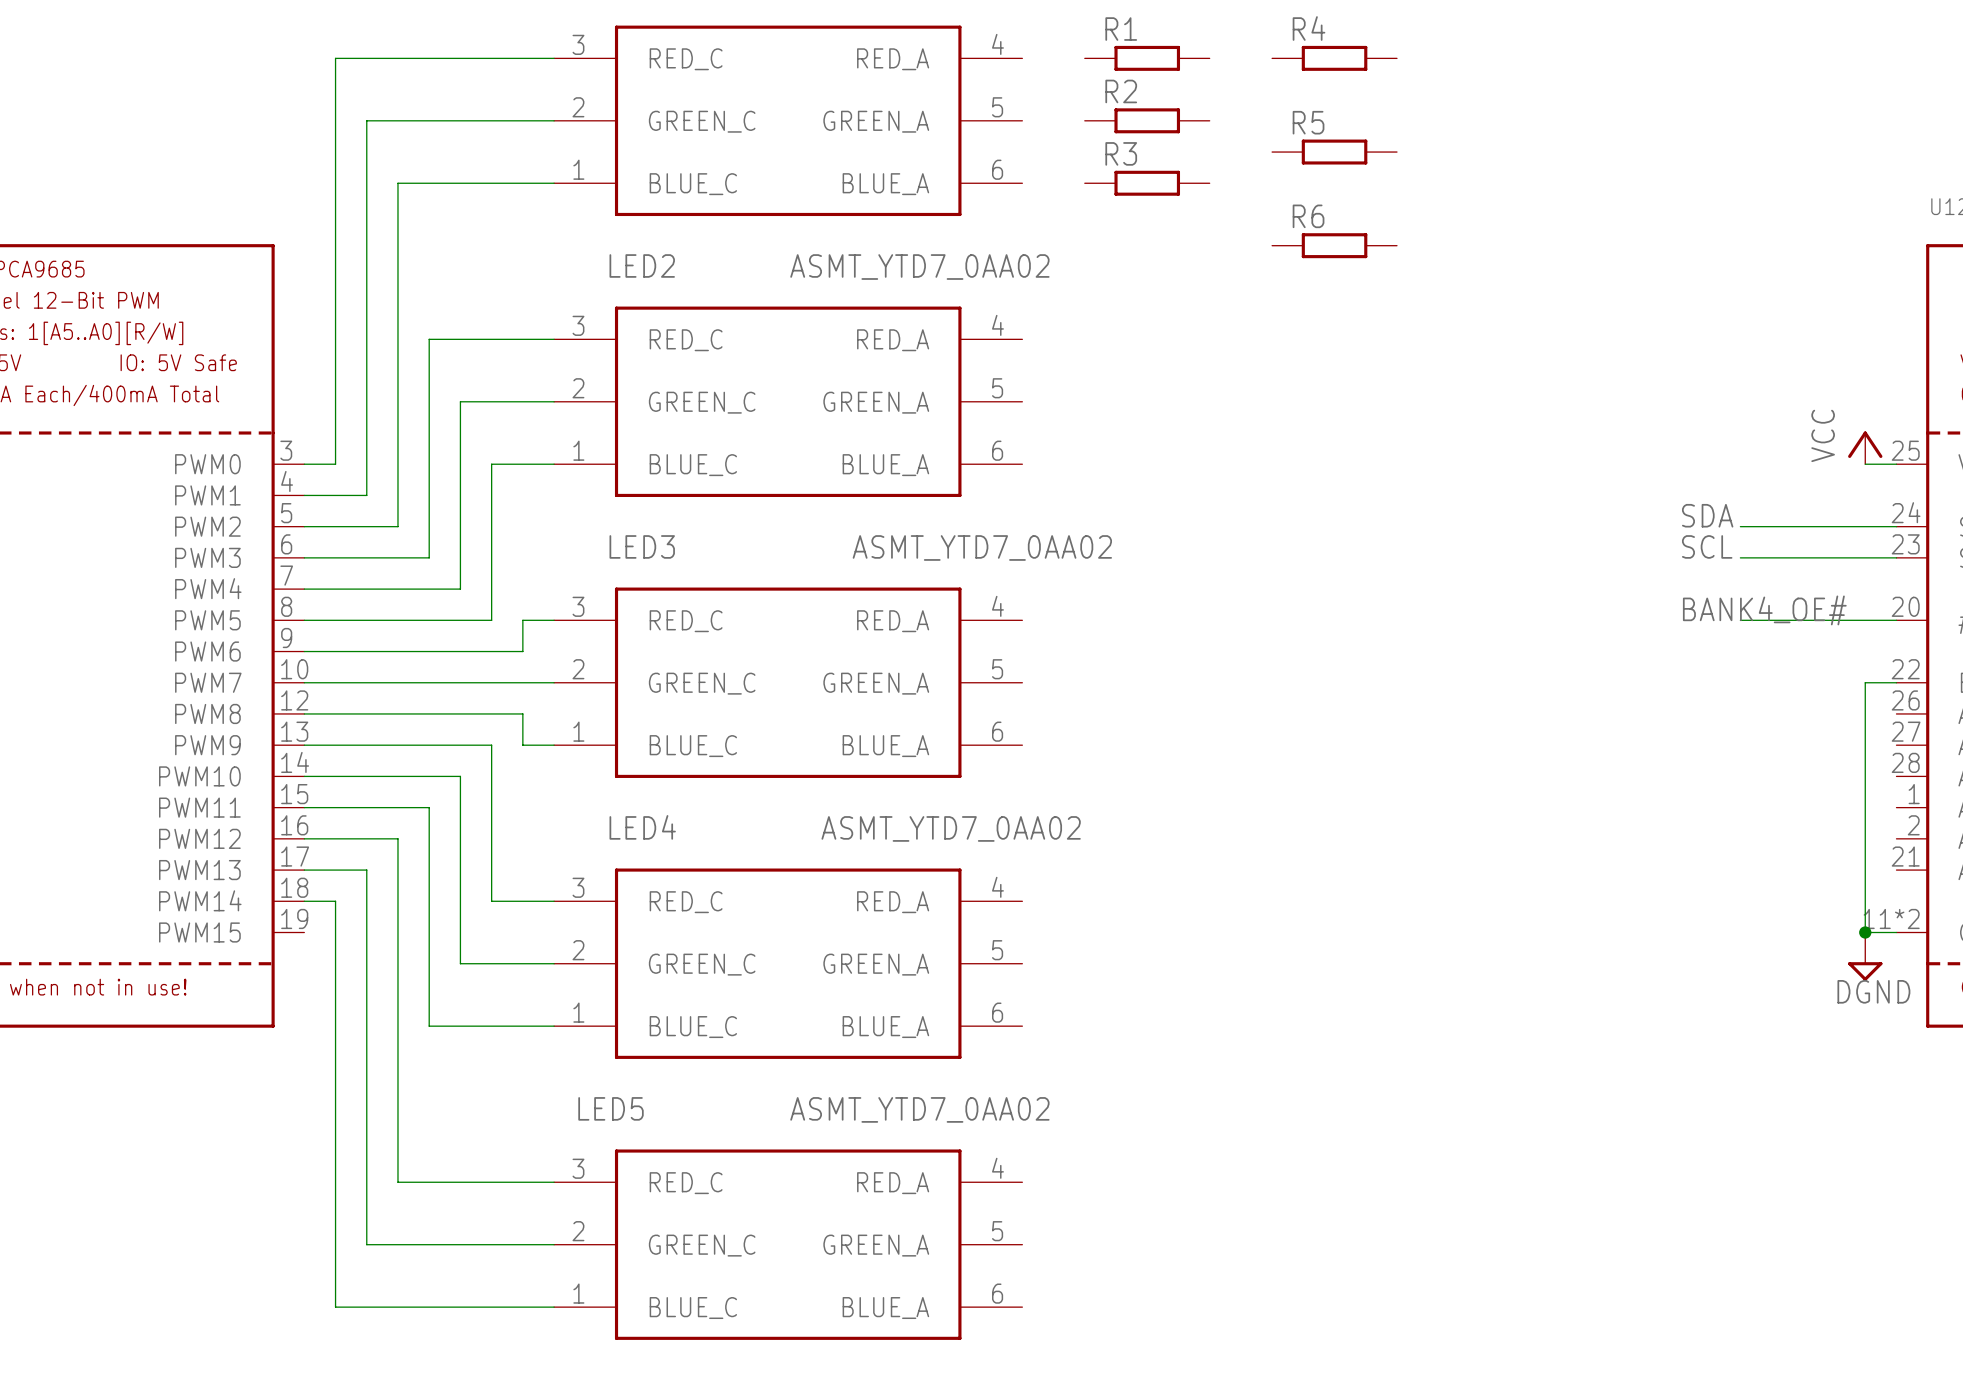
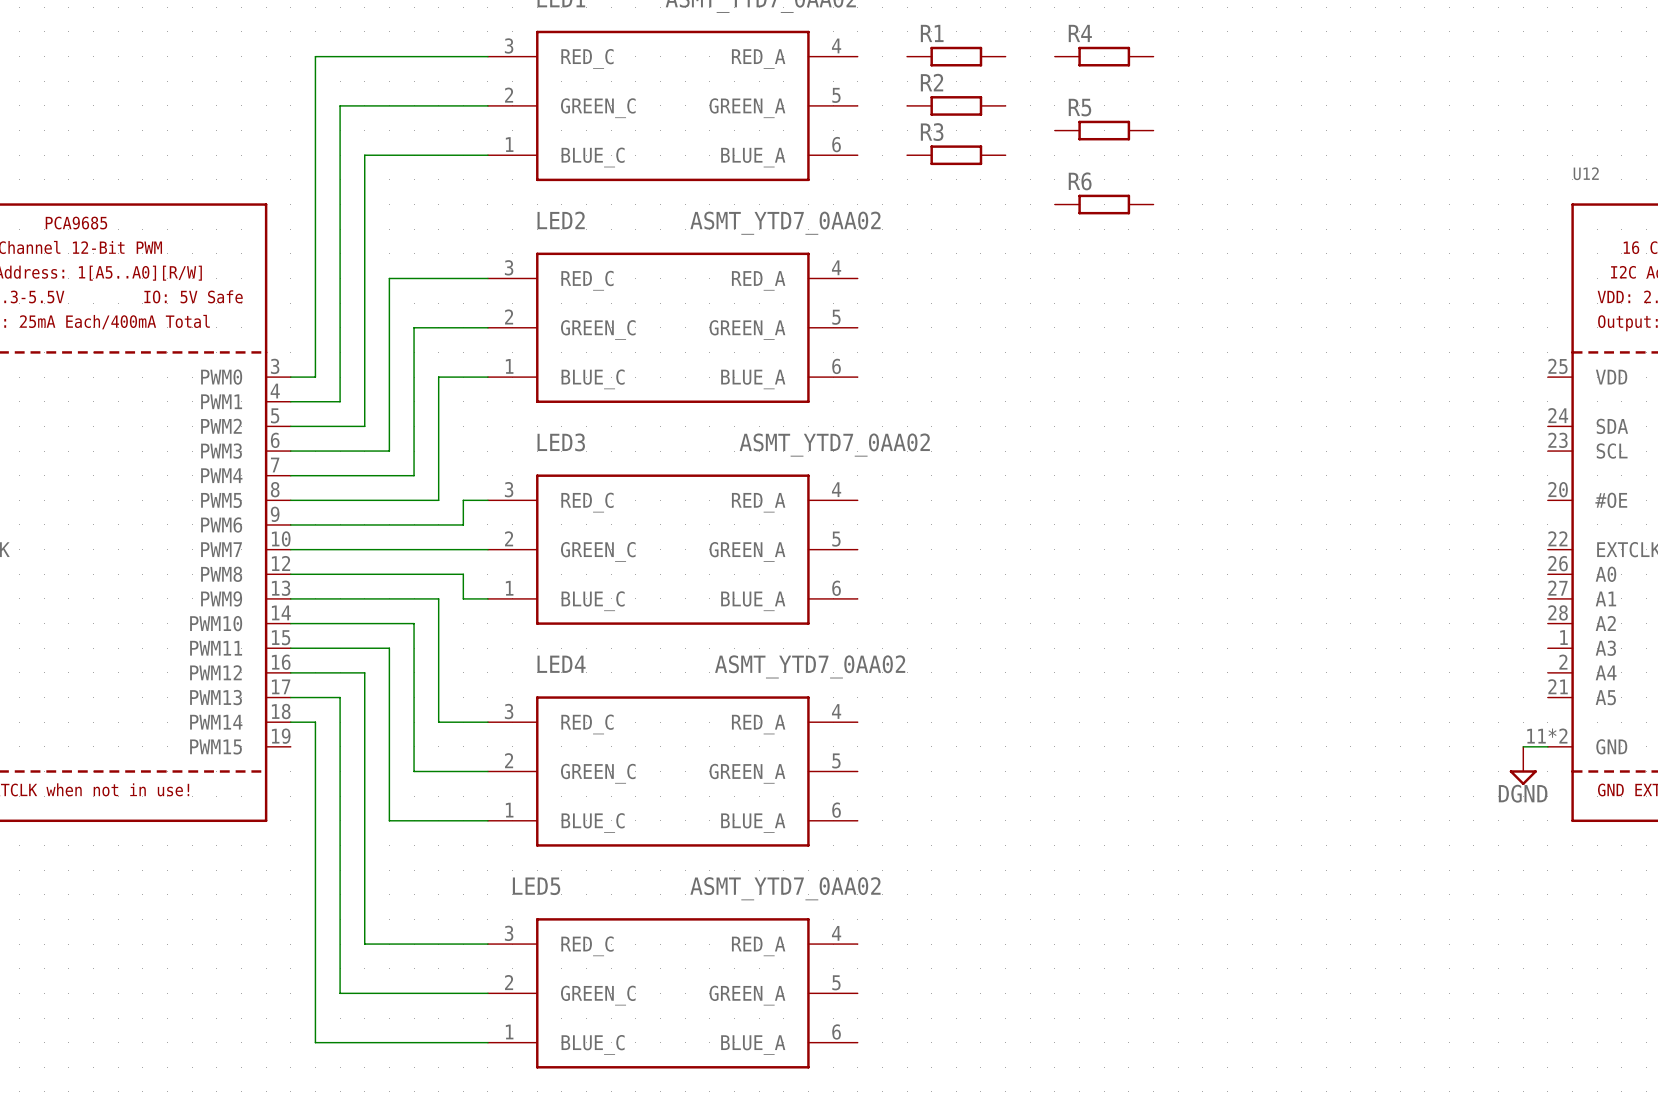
power symbol: VCC (1865, 447) -> none
wire: (1865, 464) (1896, 464) -> none
label: SDA (1707, 515) -> none
wire: (1740, 526) (1896, 526) -> none
label: SCL (1707, 546) -> none
wire: (1740, 557) (1896, 557) -> none
label: BANK4_OE# (1764, 610) -> none
wire: (1740, 620) (1896, 620) -> none
wire: (1896, 682) (1865, 682) (1865, 932) -> none
junction: (1865, 932) -> none

